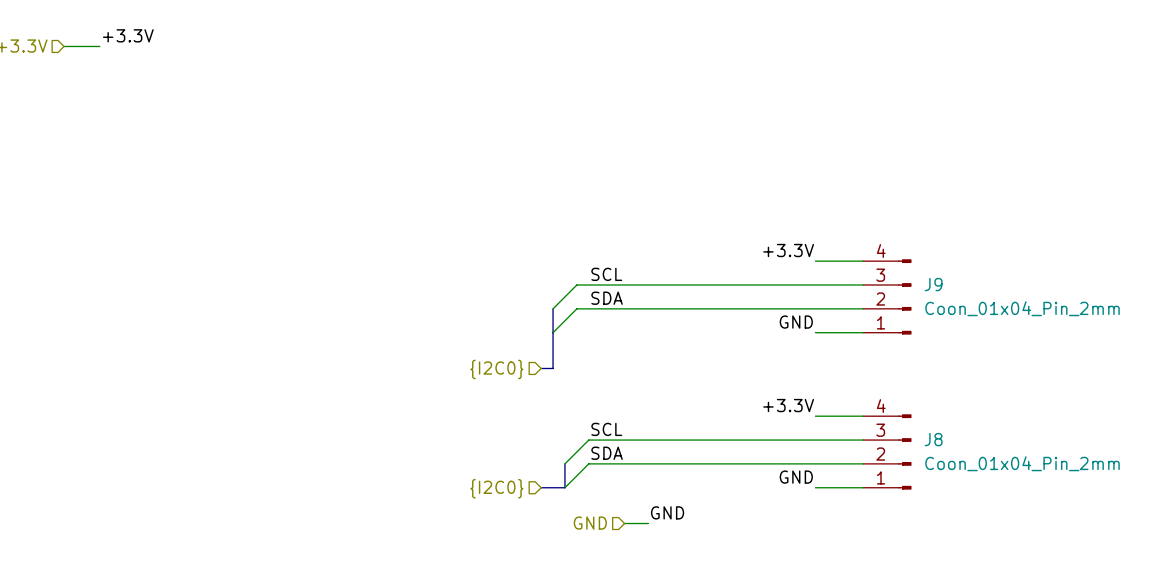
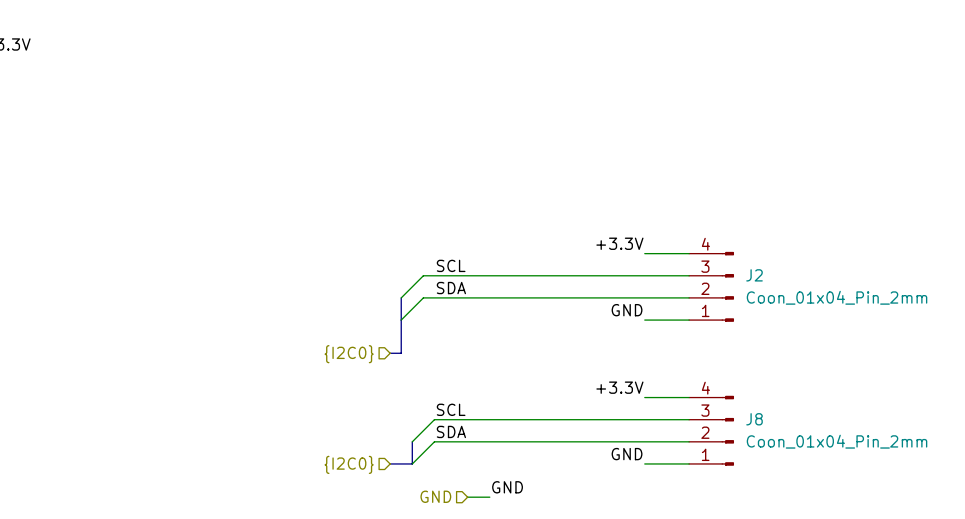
J9 name: J9 (933, 284) -> J2 (754, 275)

